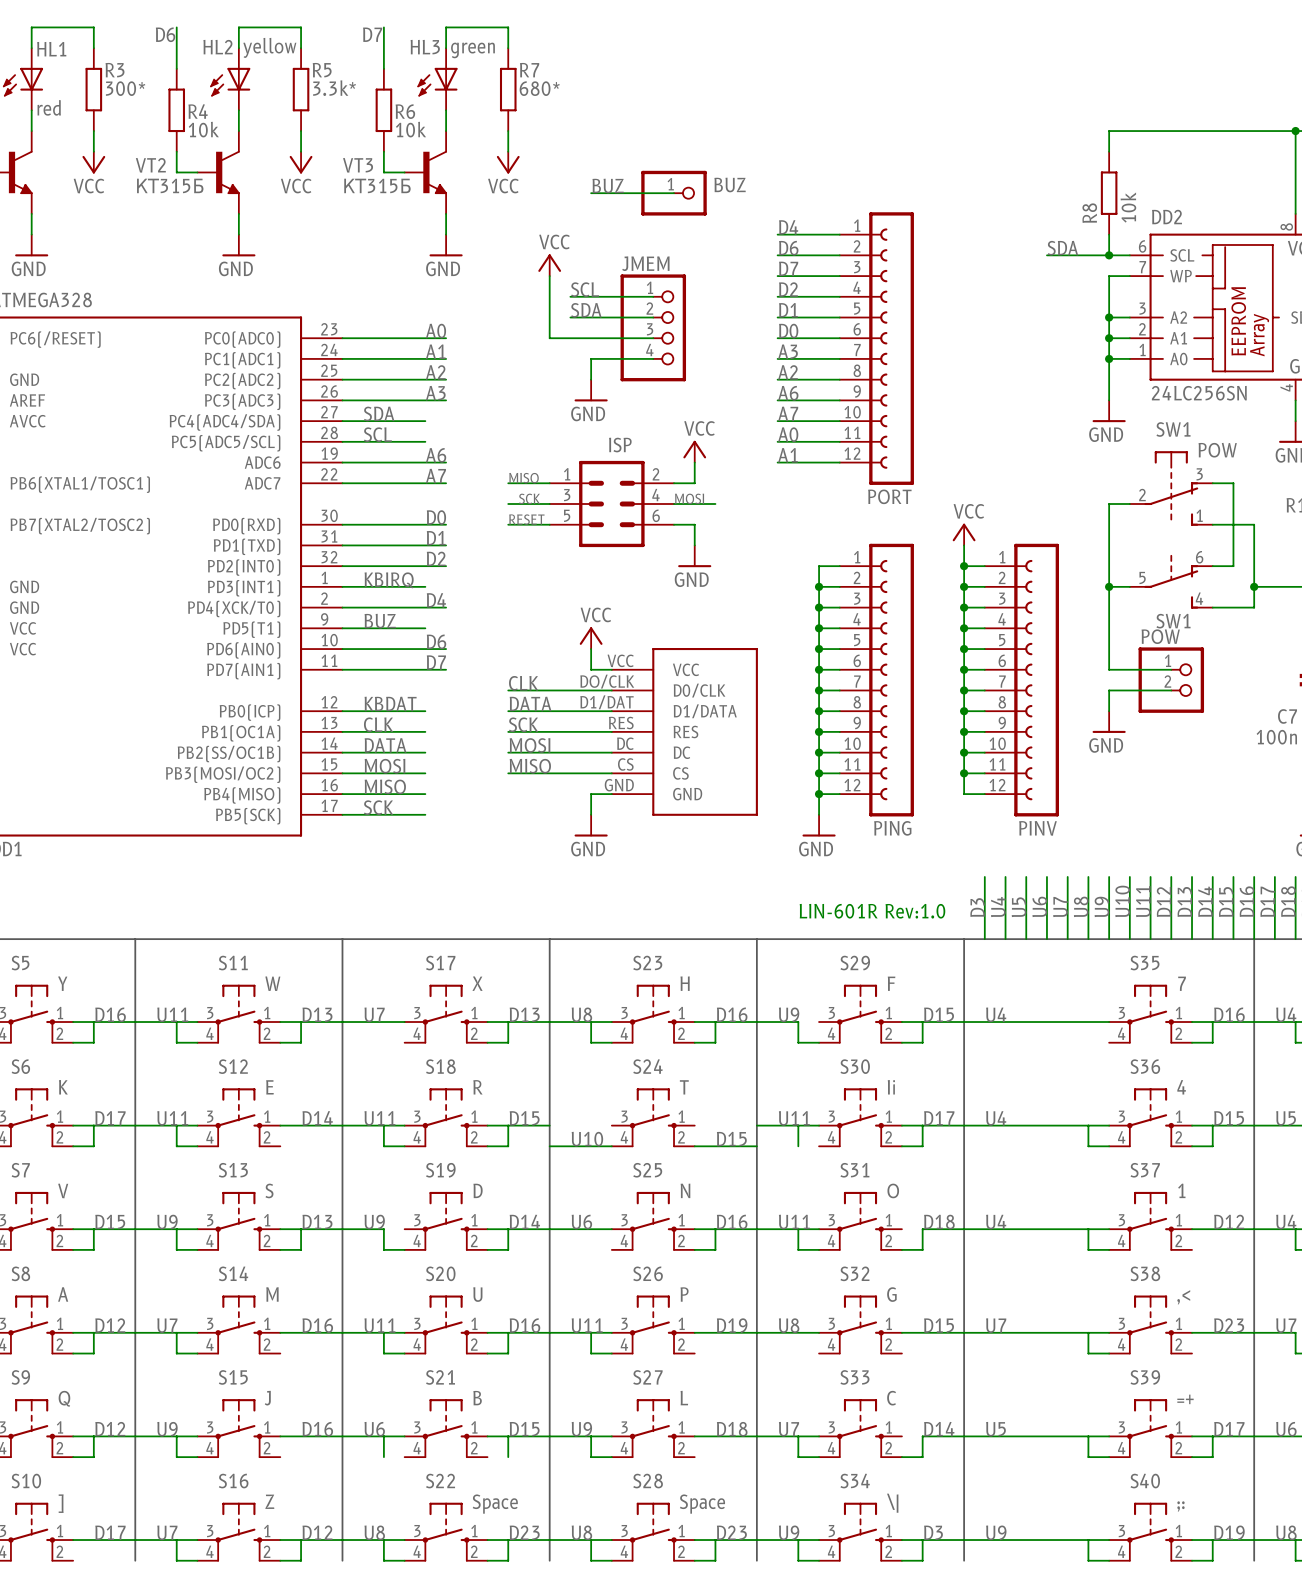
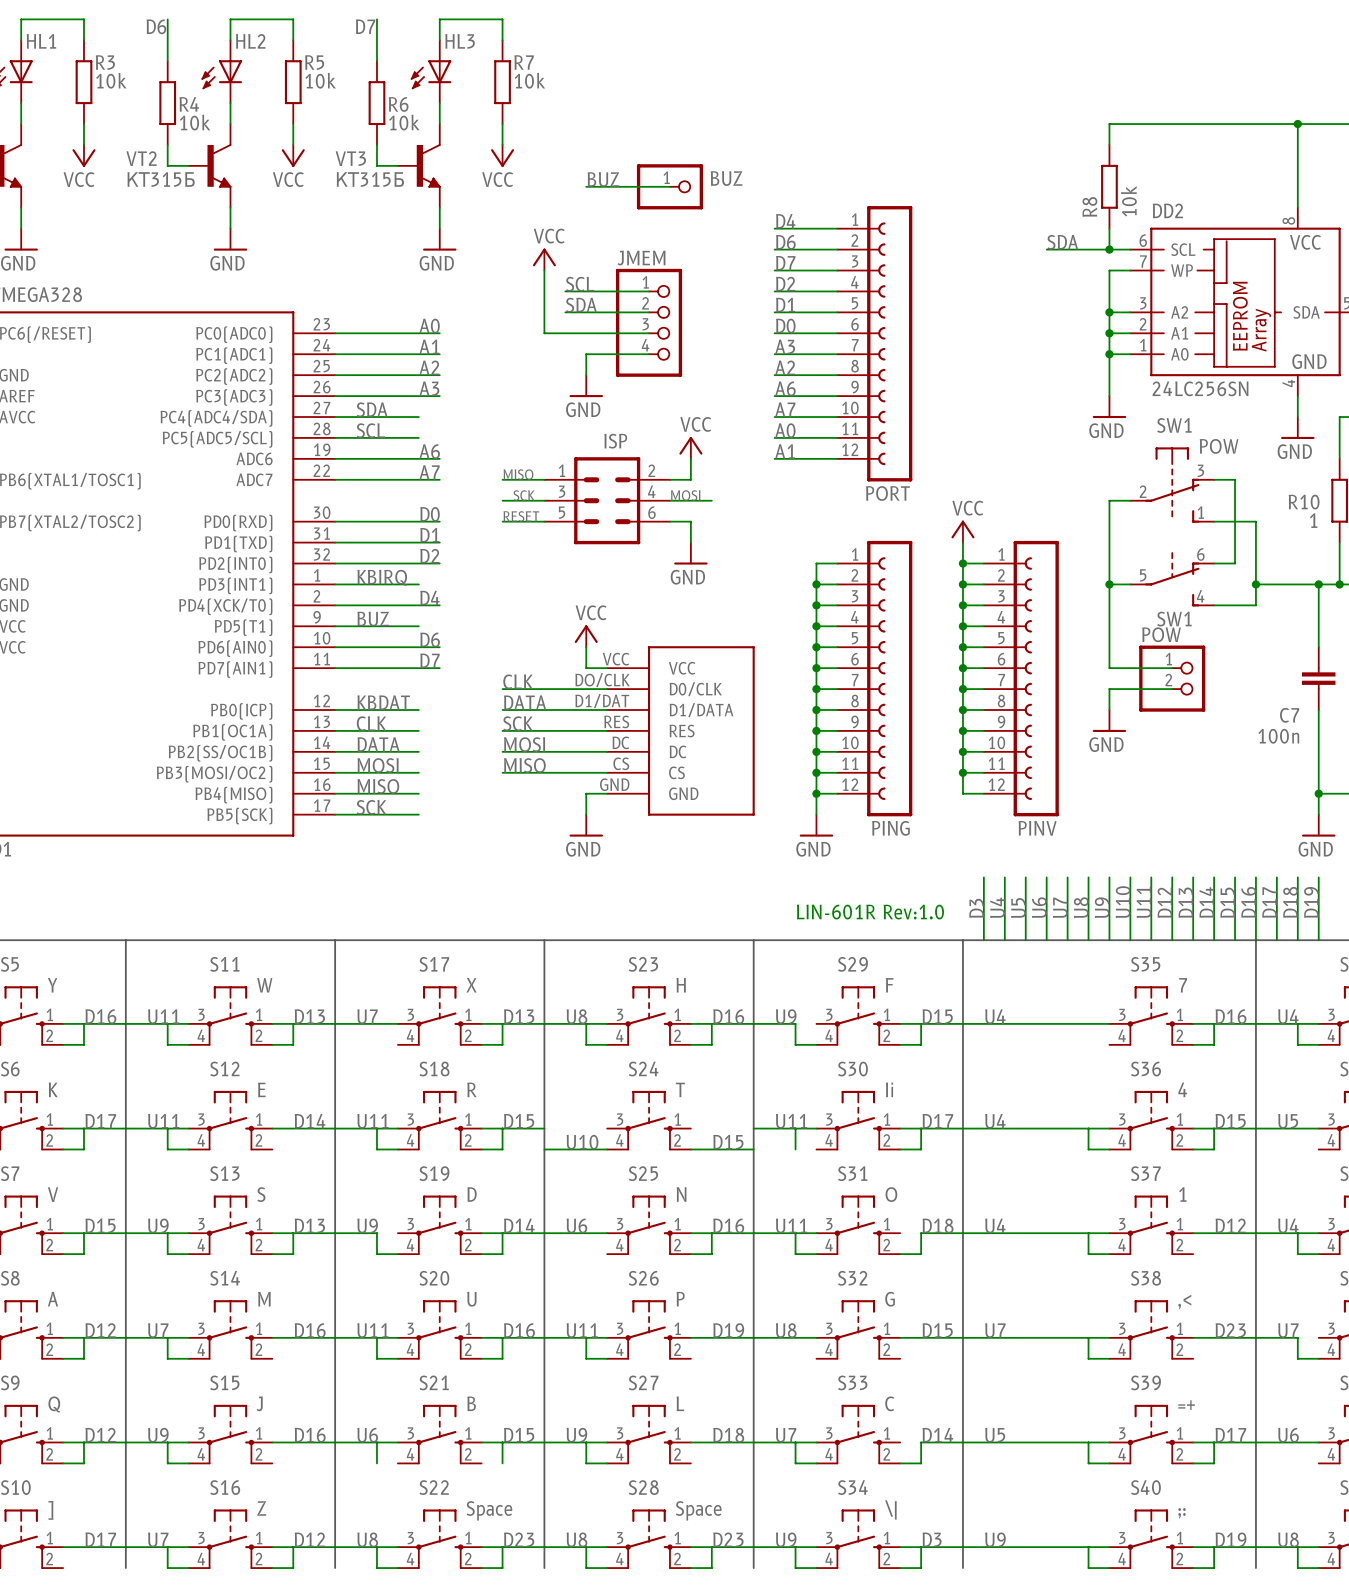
HL2 name position: HL2 (218, 47) -> HL2 (250, 41)
HL2 value: yellow (269, 47) -> none
HL3 name position: HL3 (425, 47) -> HL3 (460, 41)
HL3 value: green (472, 50) -> none
R3 value: 300* (125, 88) -> 10k (111, 80)
R5 value: 3.3k* (334, 88) -> 10k (320, 80)
R7 value: 680* (539, 88) -> 10k (529, 80)
HL1 value: red (49, 107) -> none

